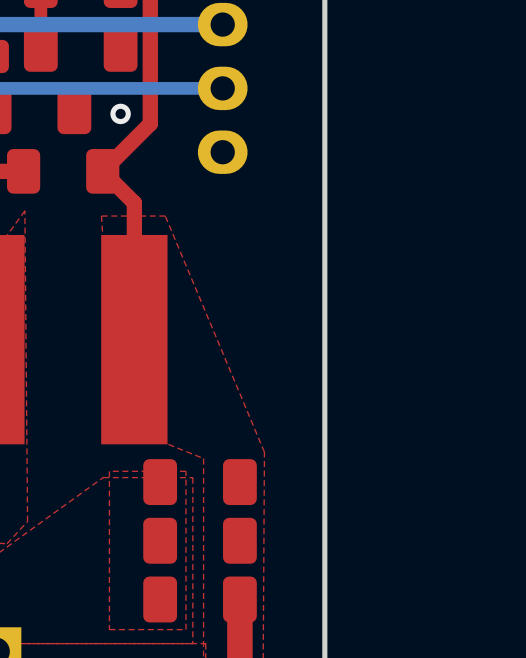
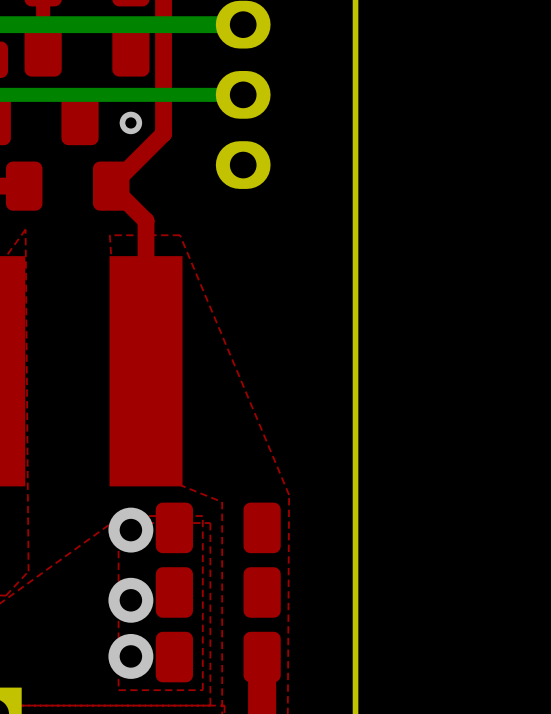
via: none -> (130, 530)
via: none -> (130, 600)
via: none -> (130, 656)

